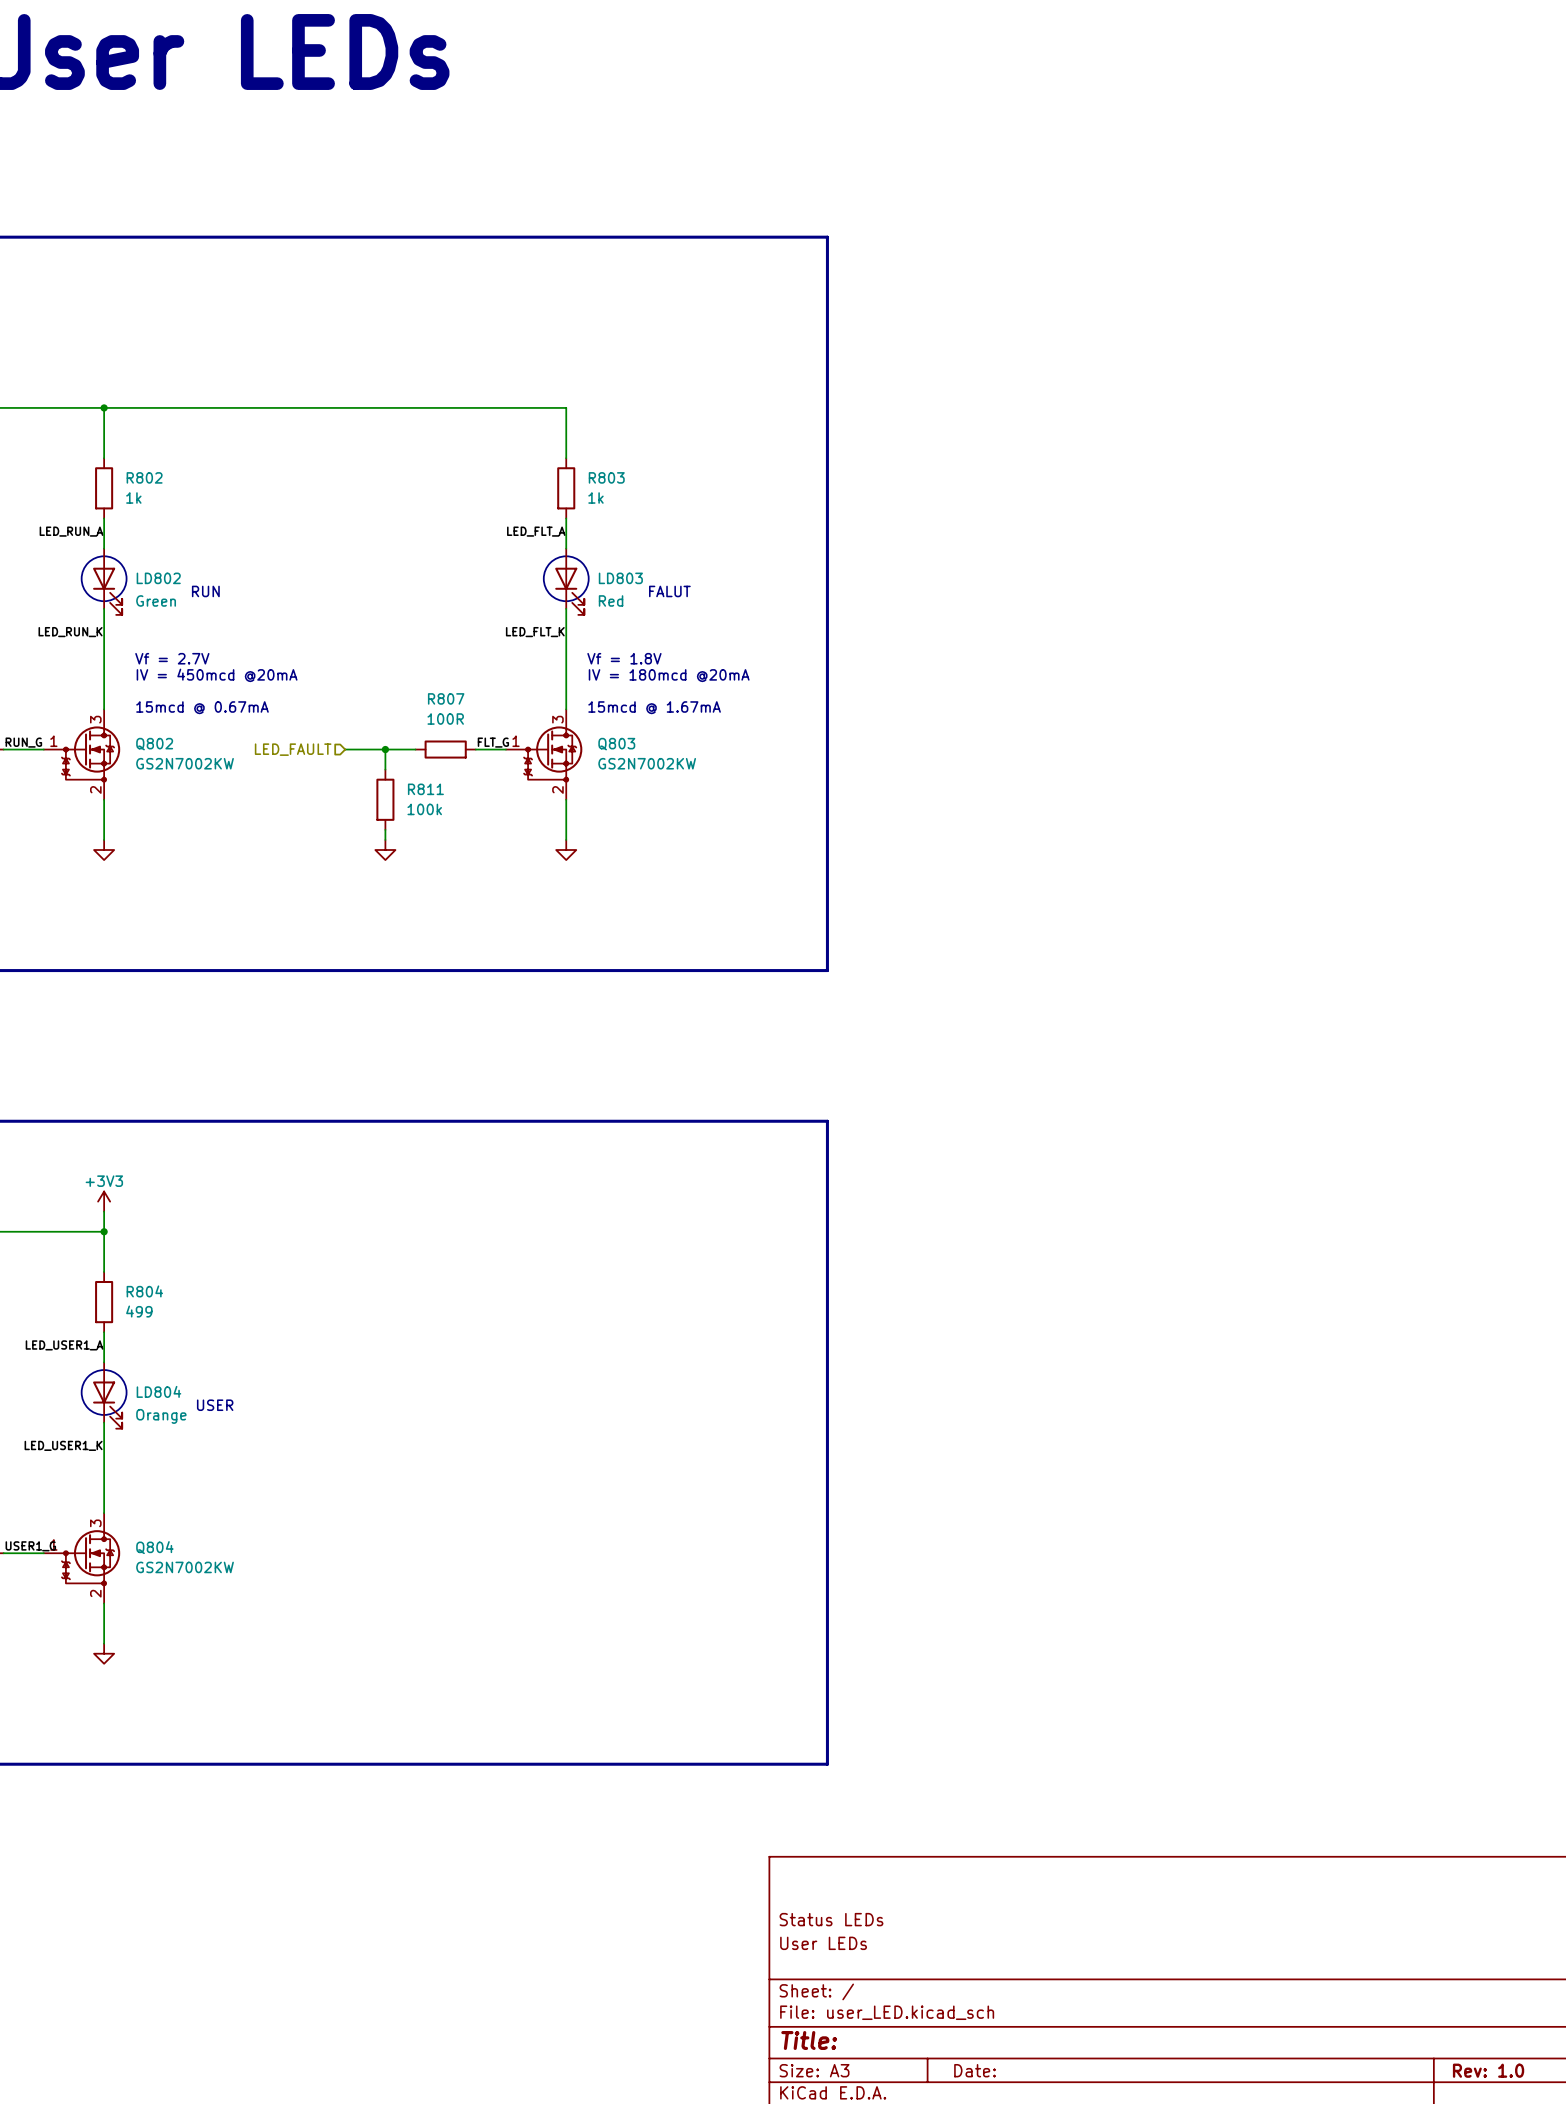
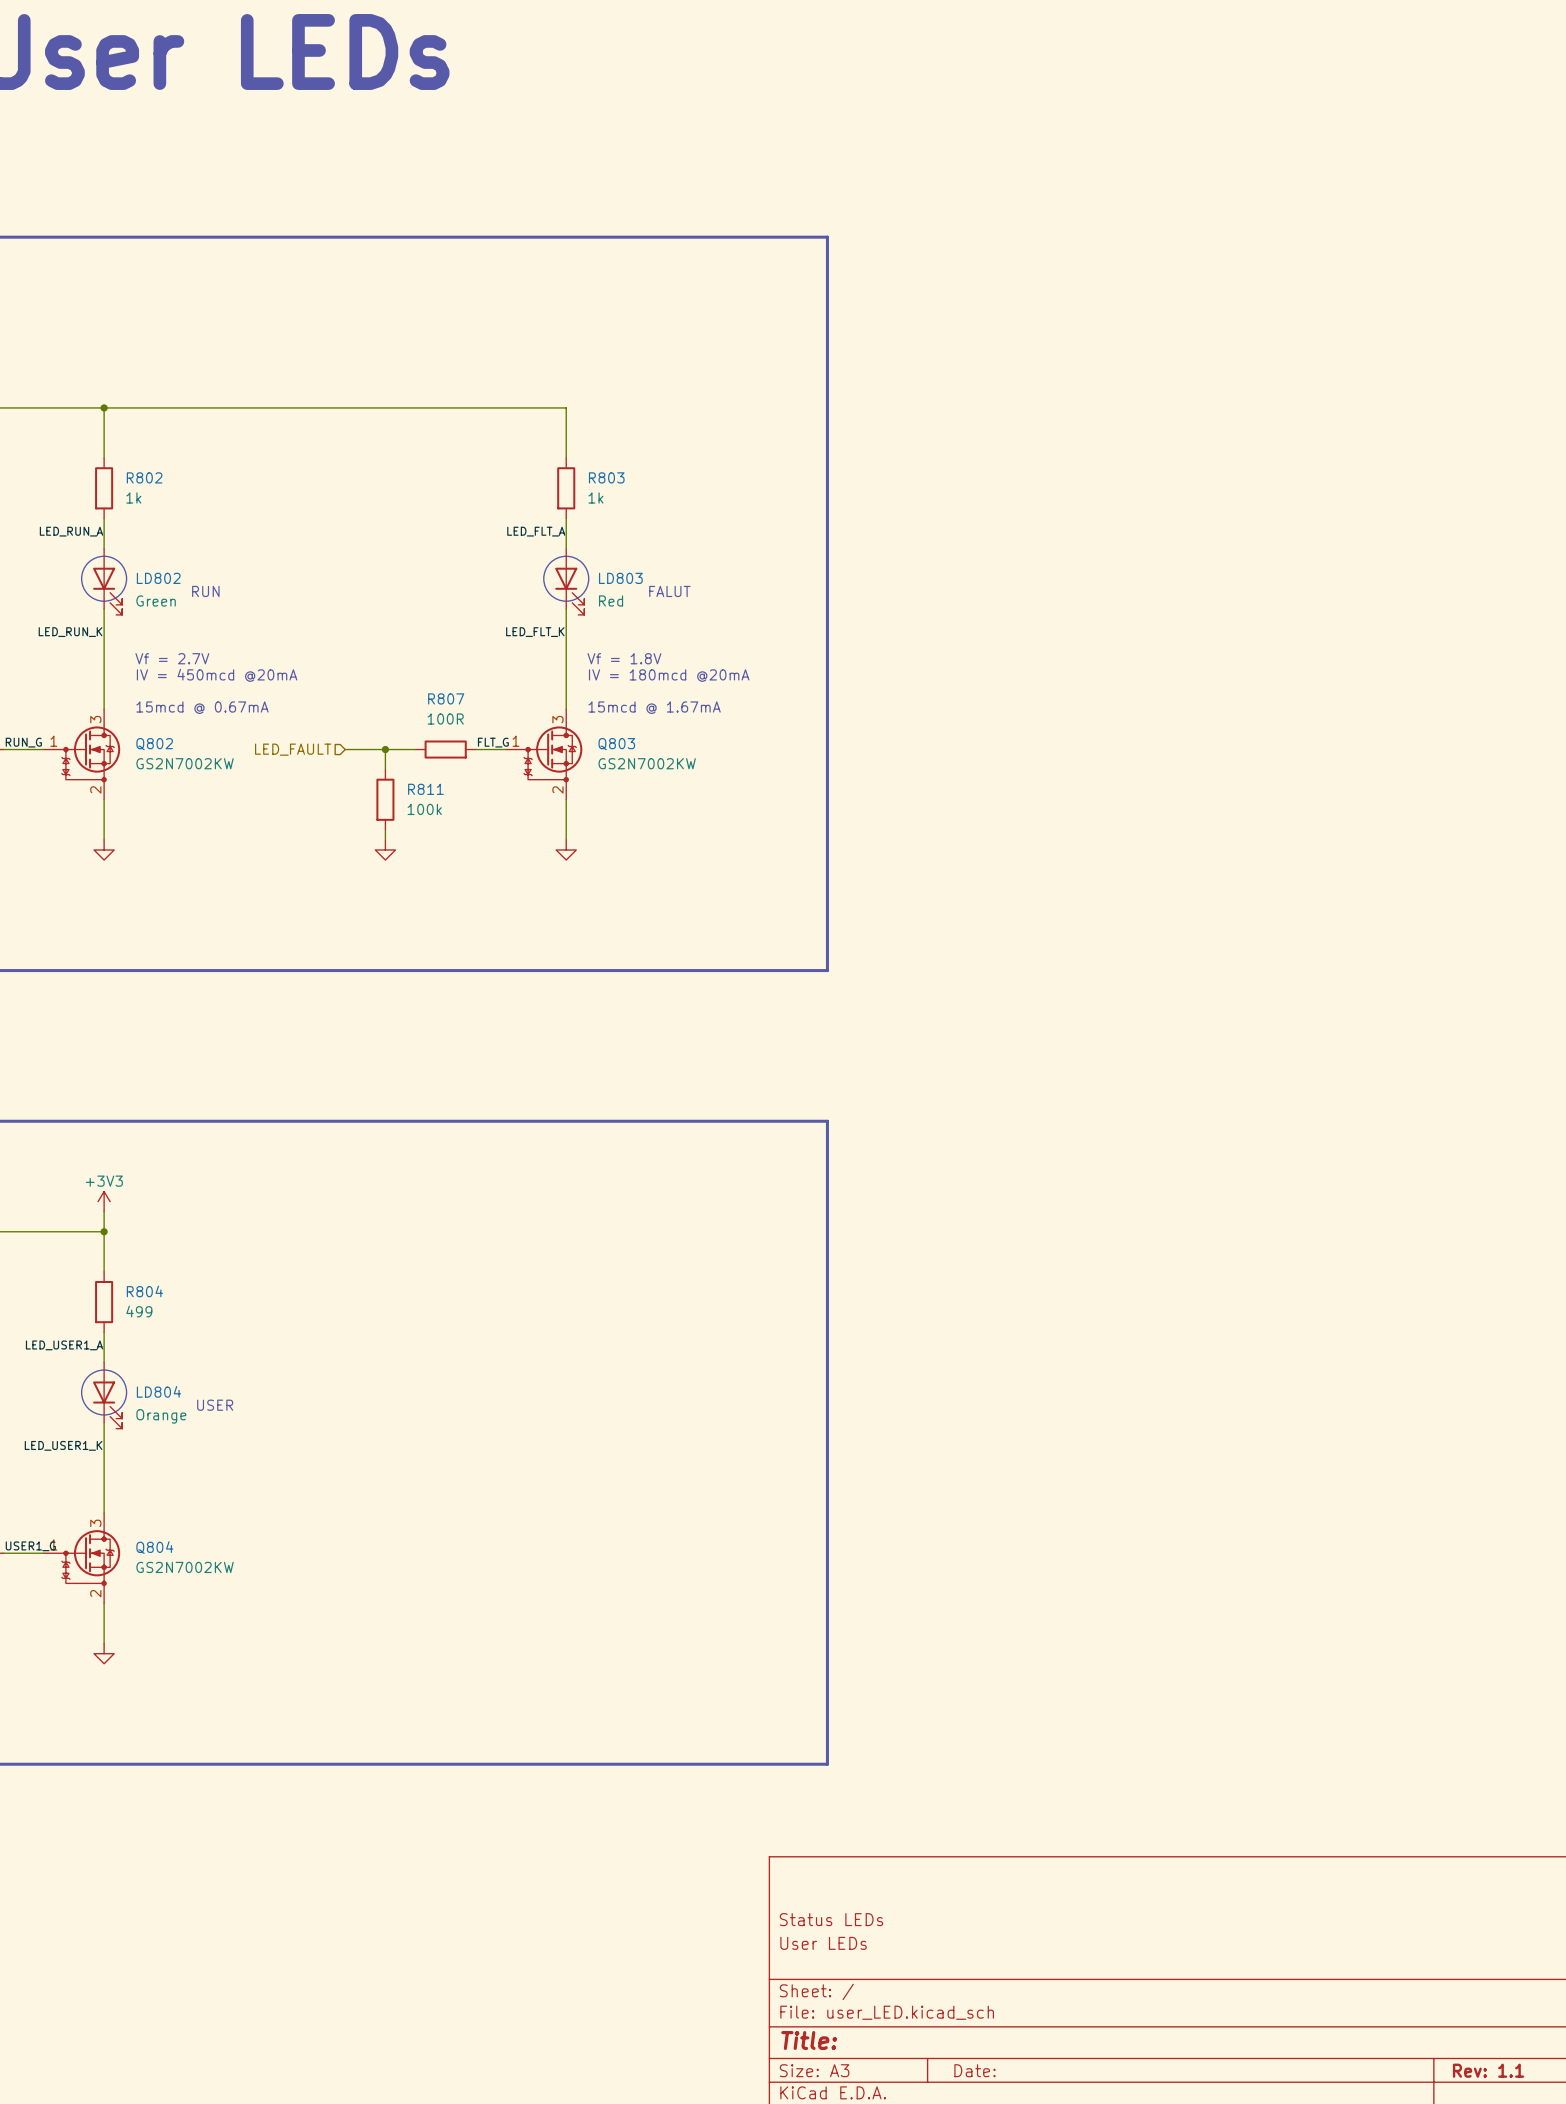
title block: Rev: 1.0 (1488, 2070) -> Rev: 1.1 (1488, 2070)

